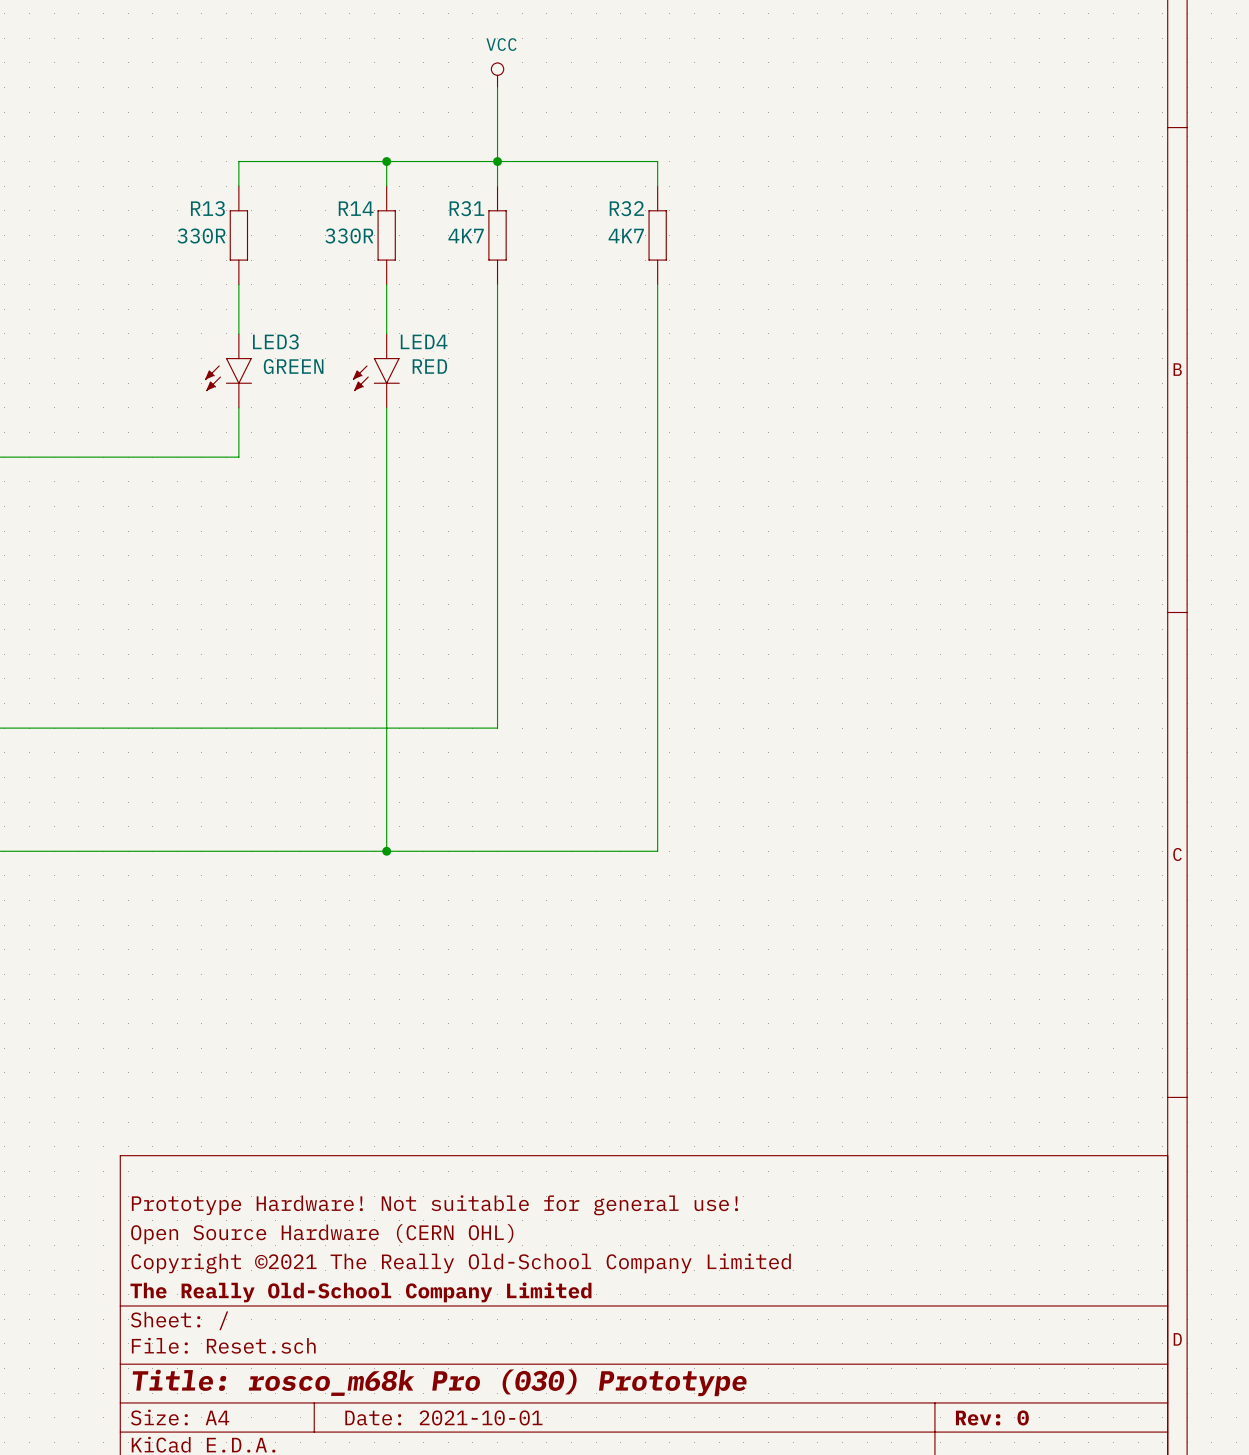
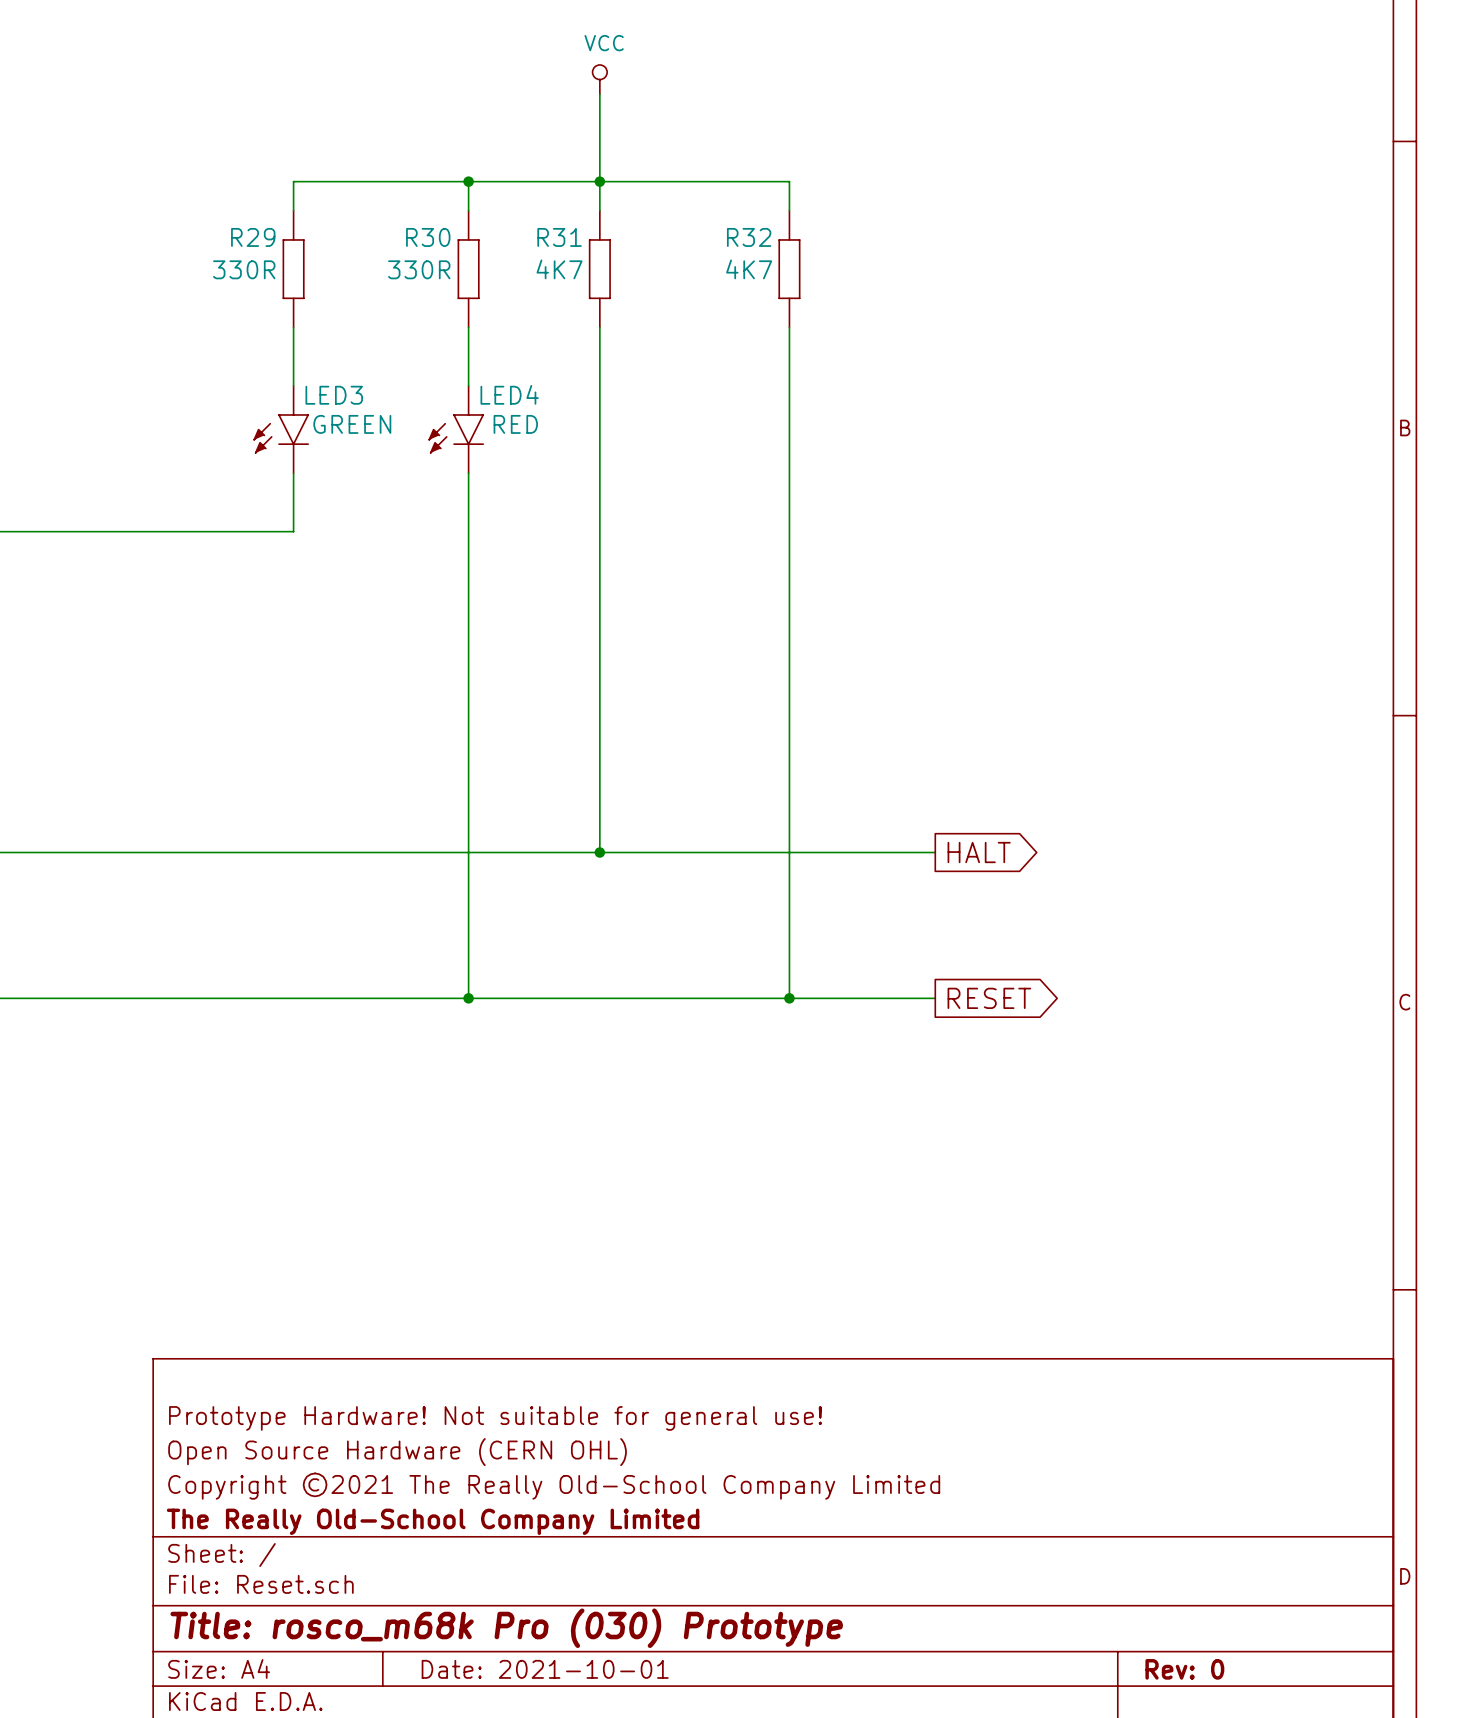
R13 name: R13 (207, 208) -> R29 (253, 237)
R14 name: R14 (356, 208) -> R30 (428, 237)
wire: none -> (599, 852) (935, 852)
junction: none -> (599, 852)
global label: none -> HALT (979, 852)
wire: none -> (789, 998) (935, 998)
junction: none -> (789, 998)
global label: none -> RESET (989, 998)

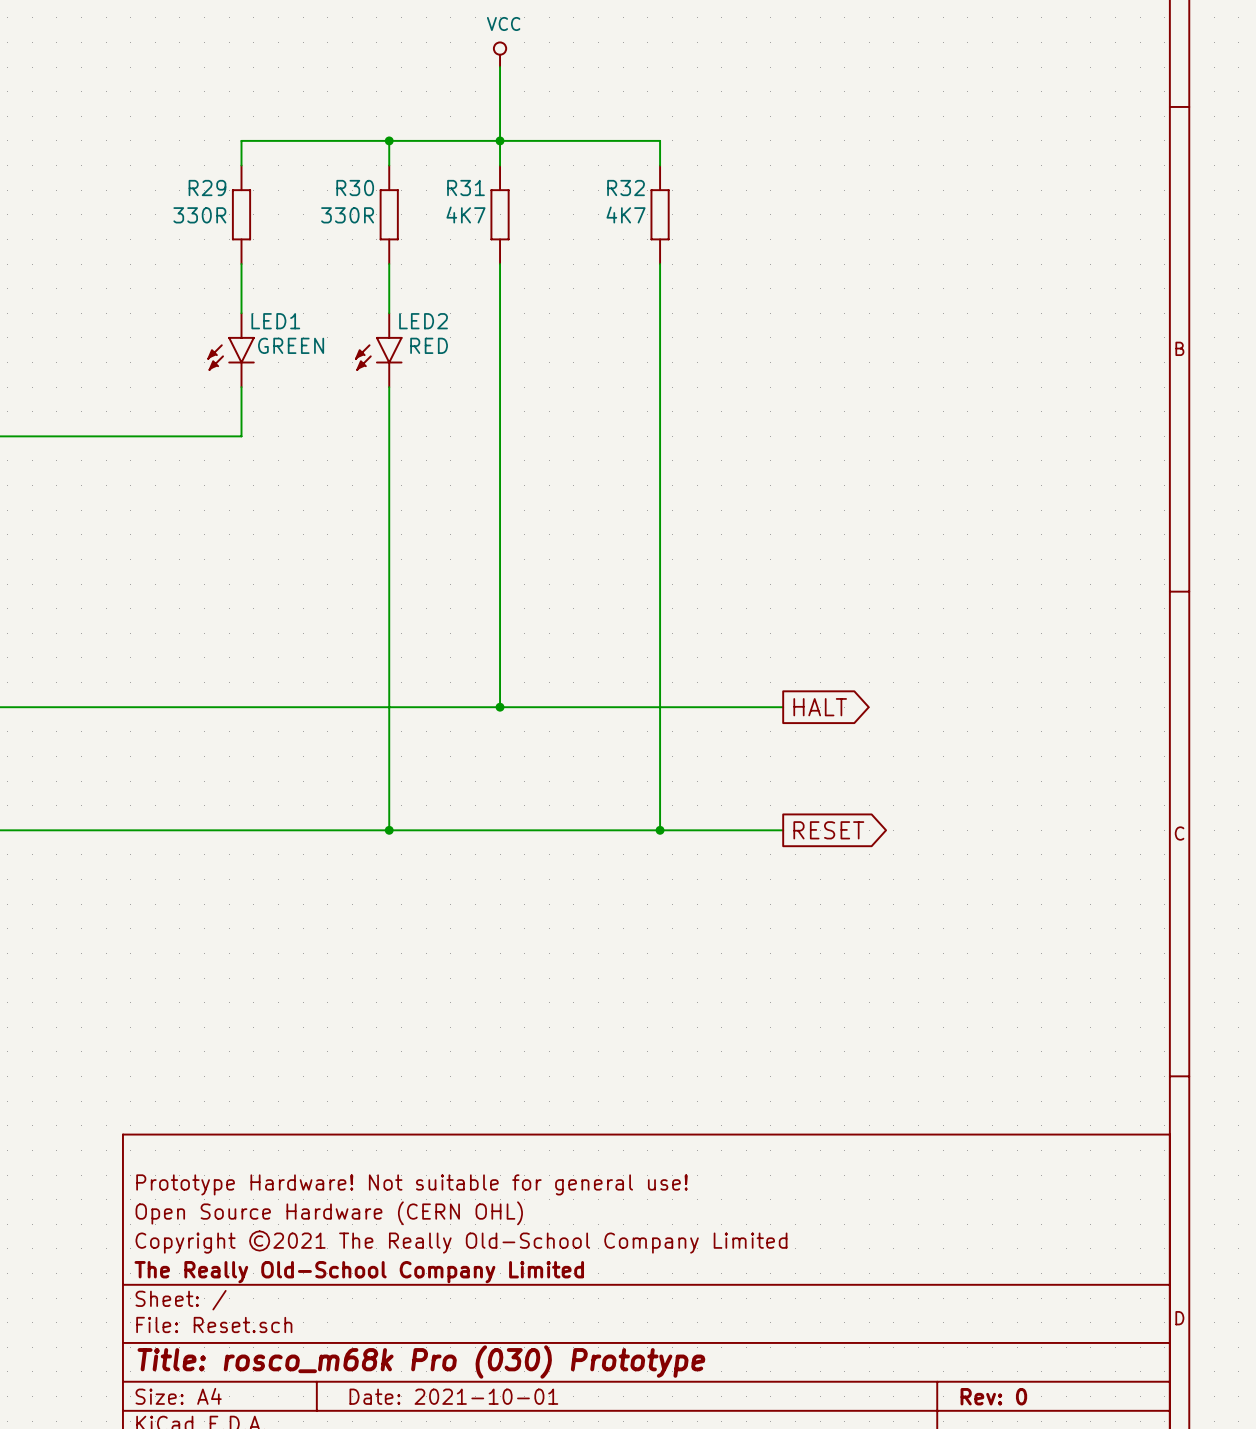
LED4 name: LED4 (509, 394) -> LED2 (423, 321)
LED3 name: LED3 (334, 395) -> LED1 (275, 321)

